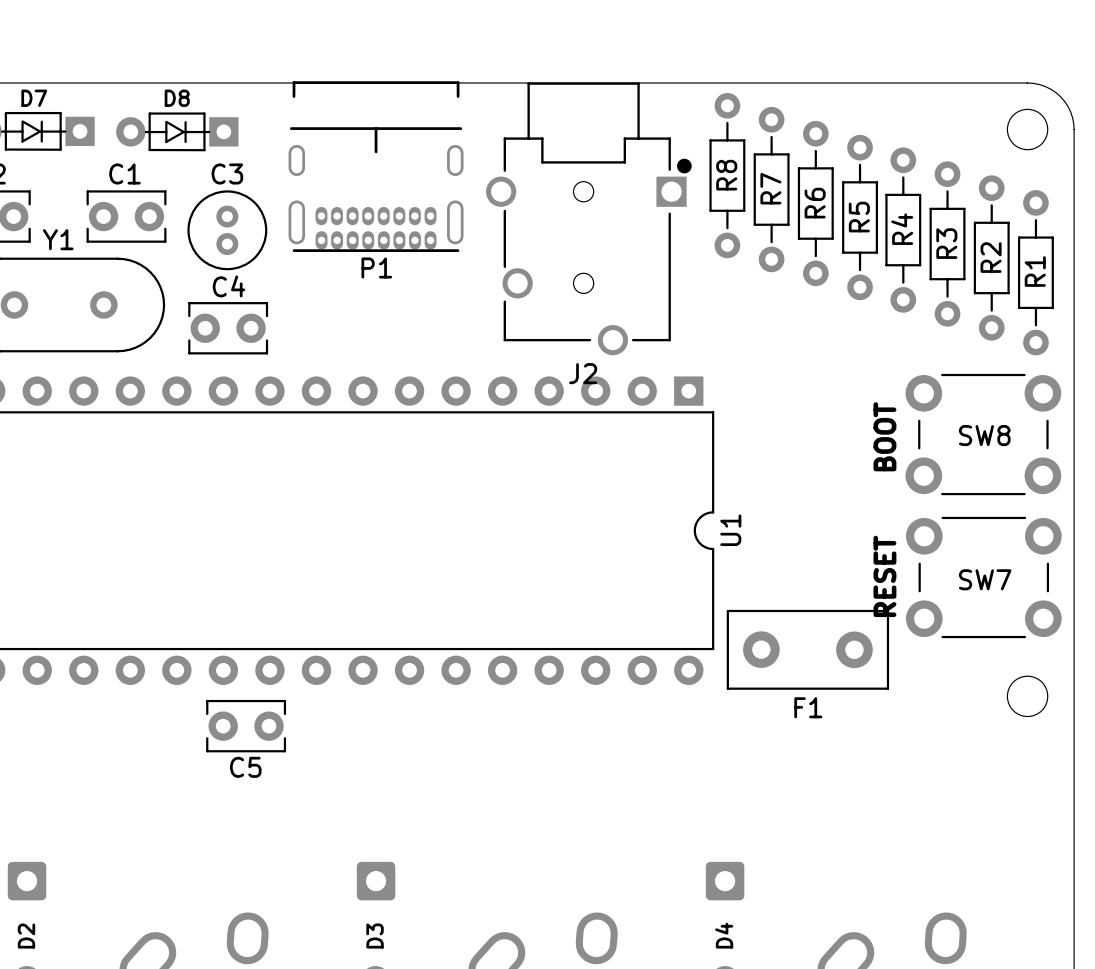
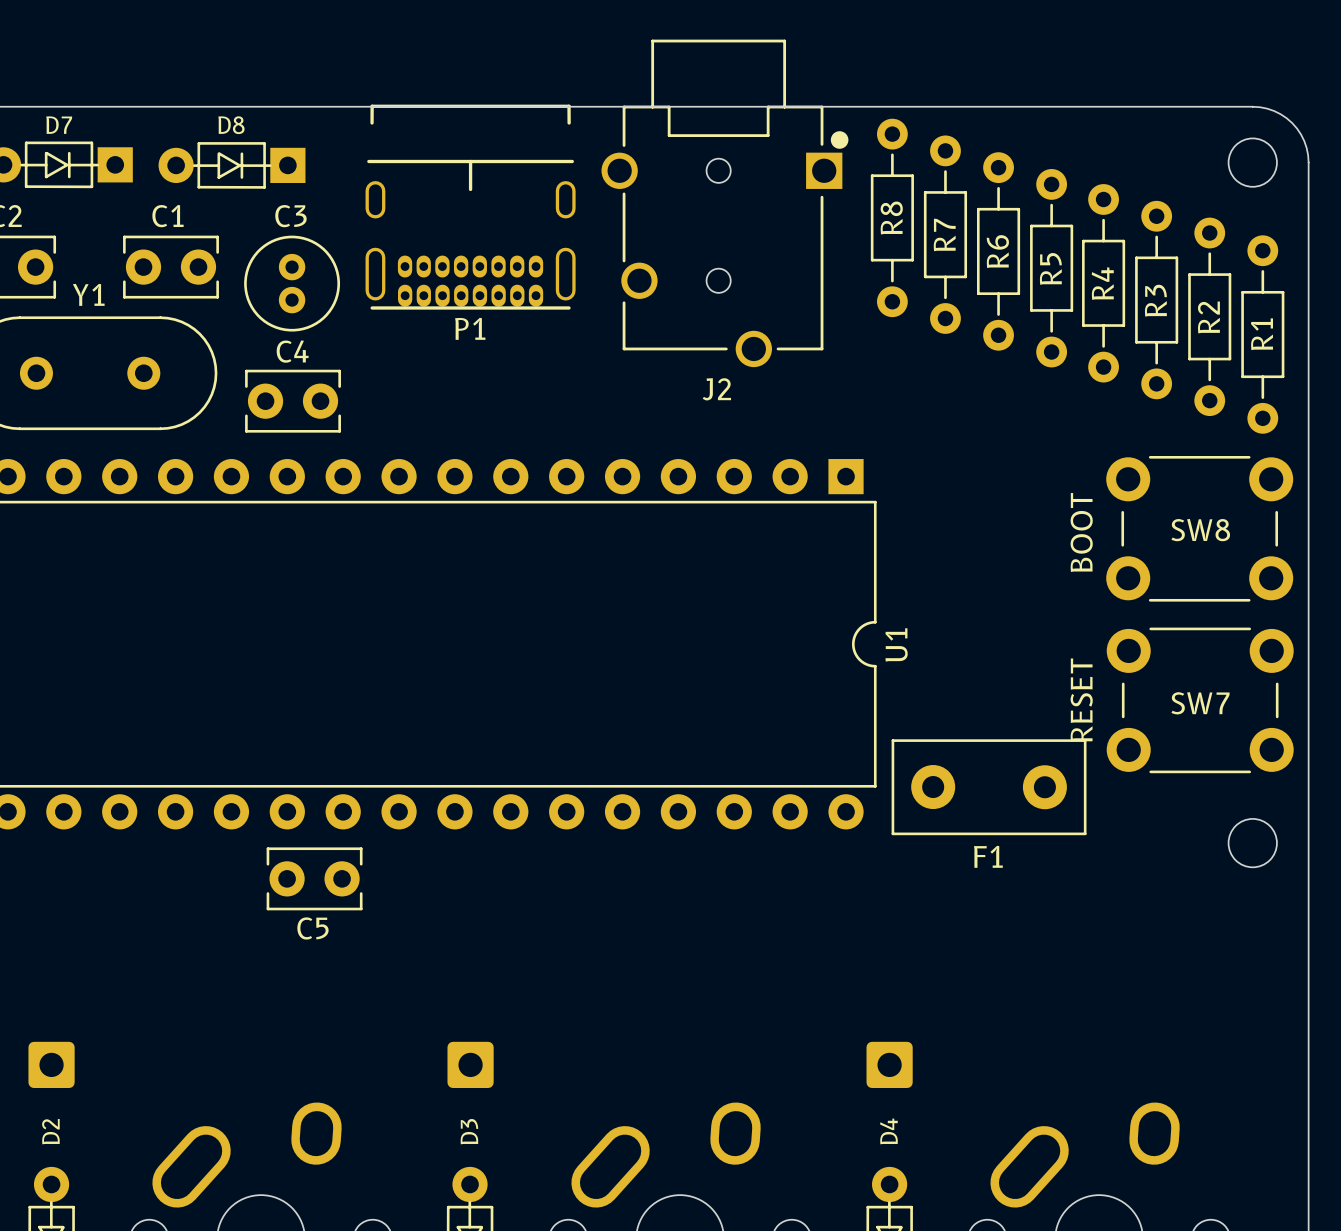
J2 position: (588, 218) -> (724, 203)

